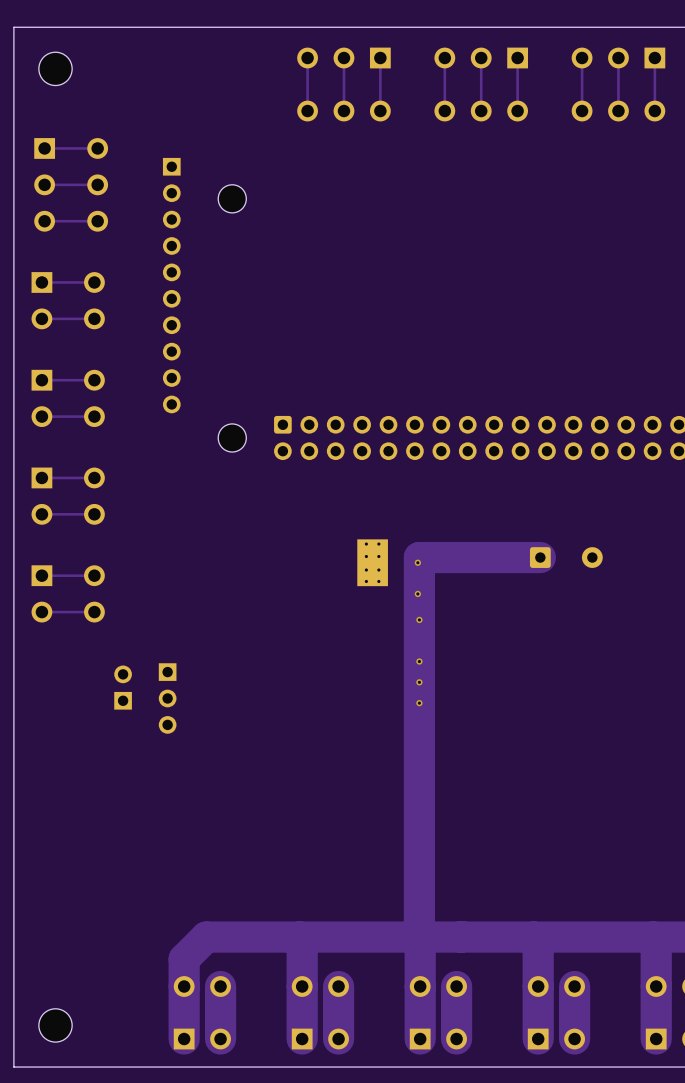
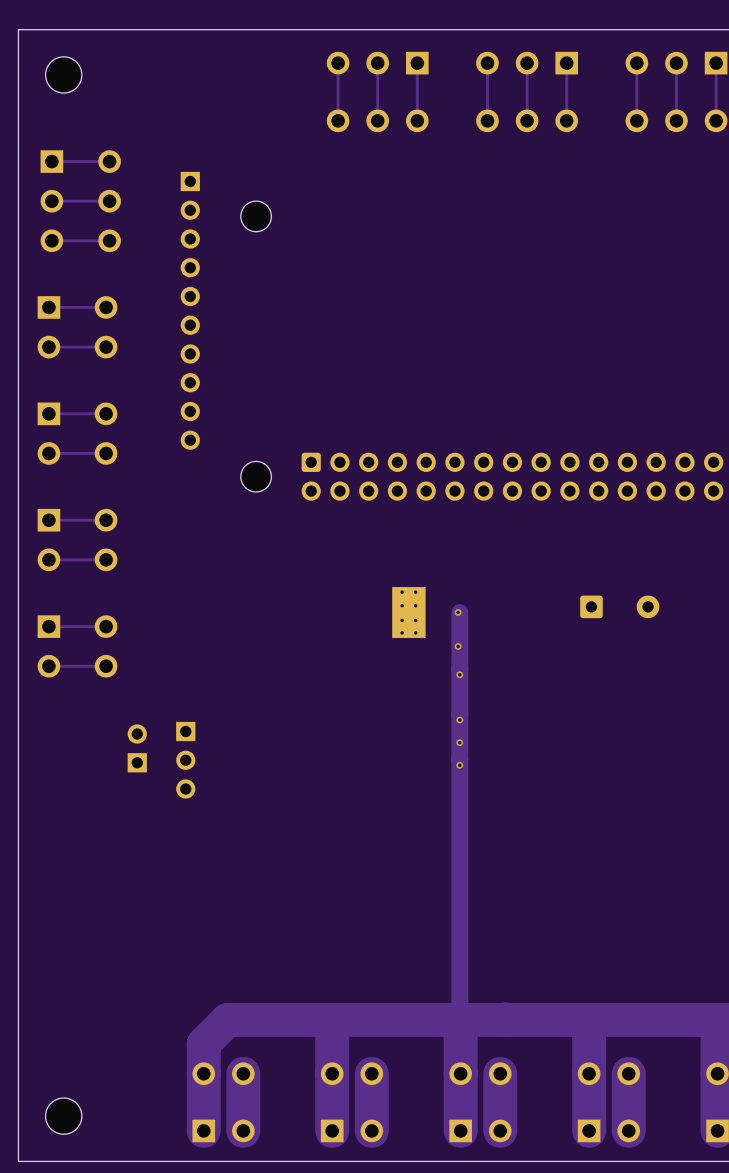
track: (540, 557) (419, 557) (419, 562) -> none
track width: thick (419, 562) (419, 937) -> thin (459, 612) (459, 1019)

